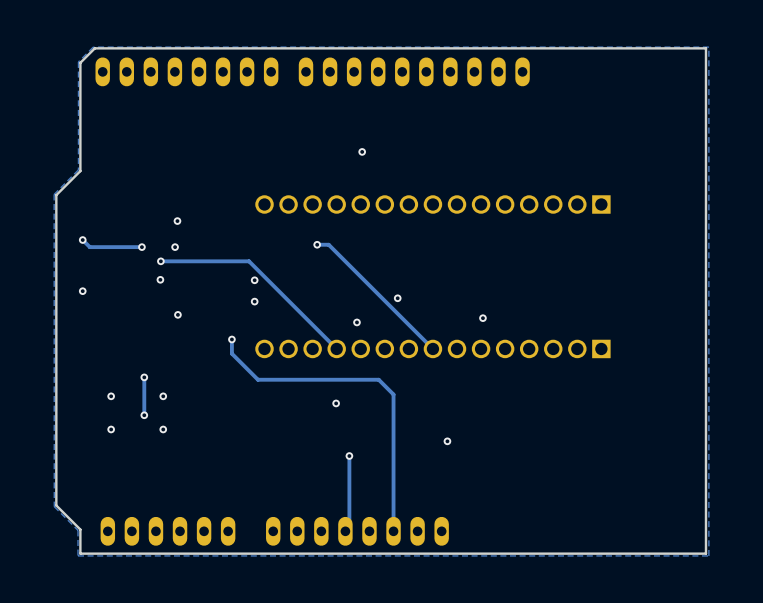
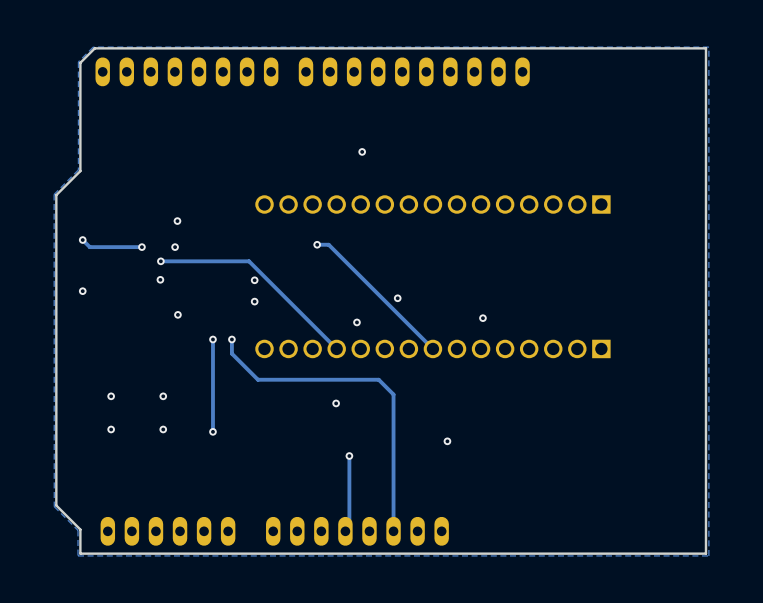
track: none -> (212, 339) (212, 431)
via: none -> (212, 339)
track: (144, 377) (144, 415) -> none
via: (144, 377) -> none
via: (144, 415) -> none
via: none -> (212, 431)

